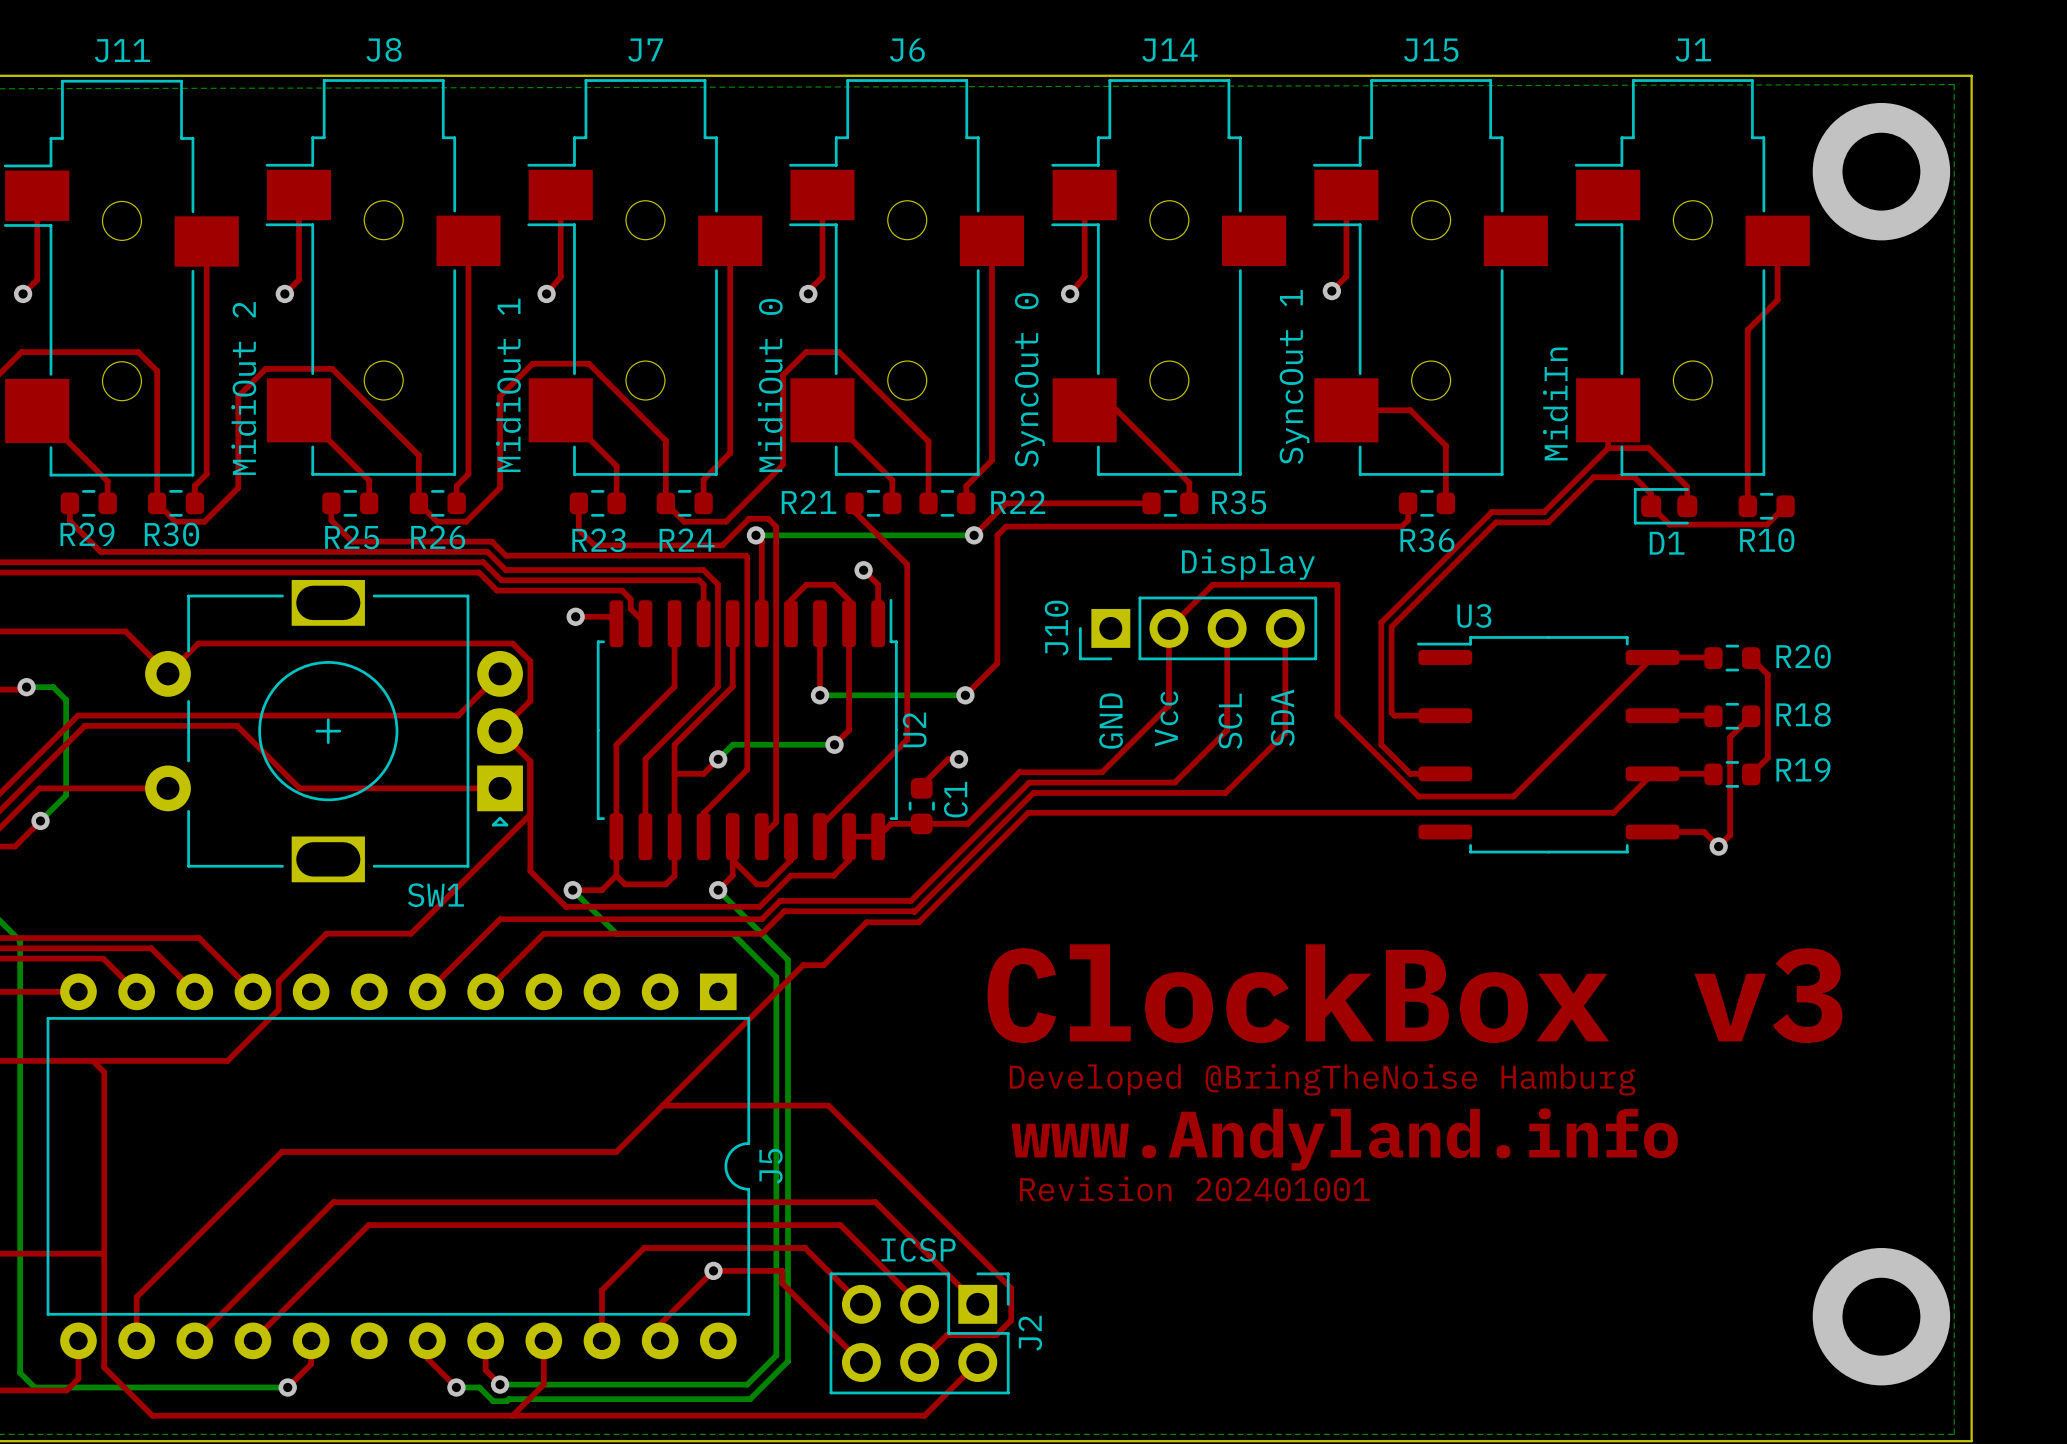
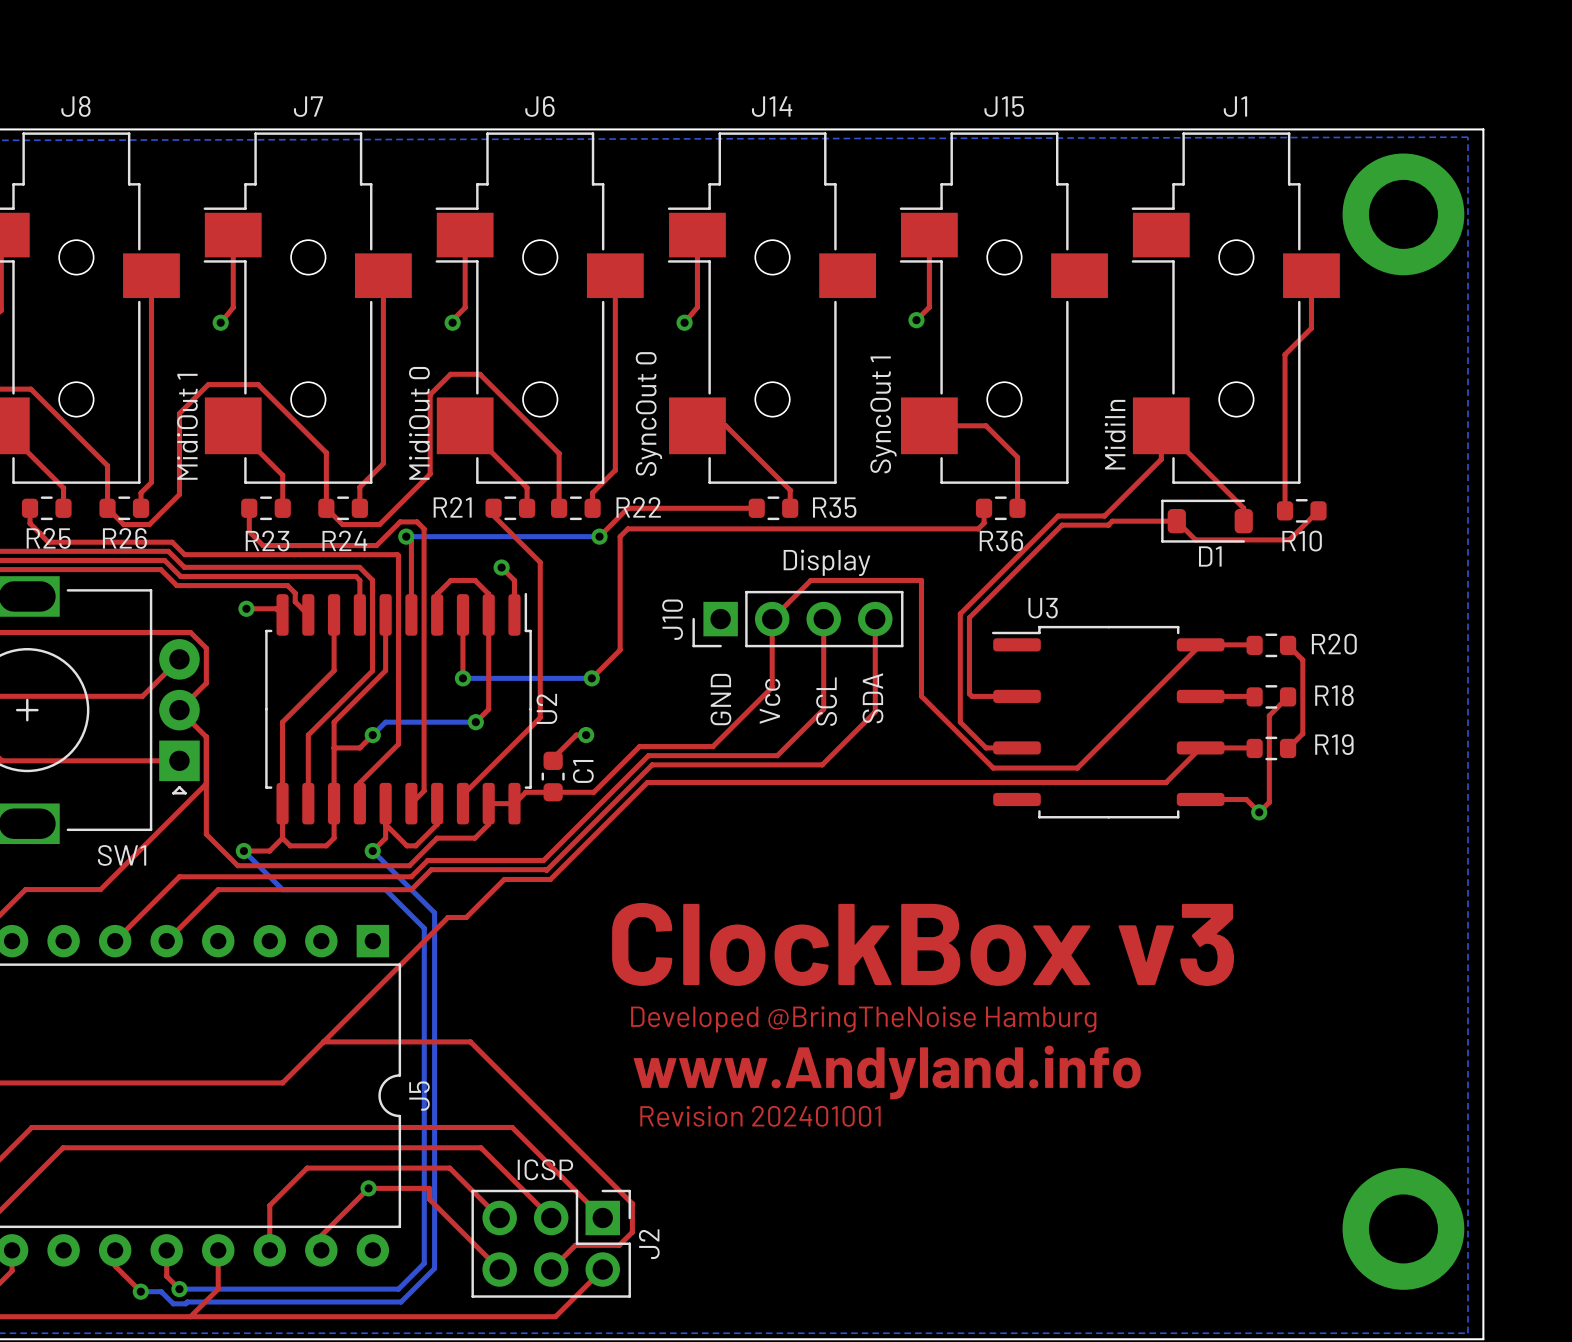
top track: none -> (1161, 425) (1243, 508) (1243, 521)
top track: (1608, 448) (1648, 448) (1687, 486) (1687, 506) -> none
D1 footprint: [1633, 488, 1698, 525] -> [1161, 499, 1253, 543]
top track: (1552, 517) (1593, 477) (1634, 477) (1651, 494) (1651, 506) (1669, 524) (1767, 524) -> (1112, 521) (1176, 521) (1195, 539) (1289, 539) (1302, 527)

